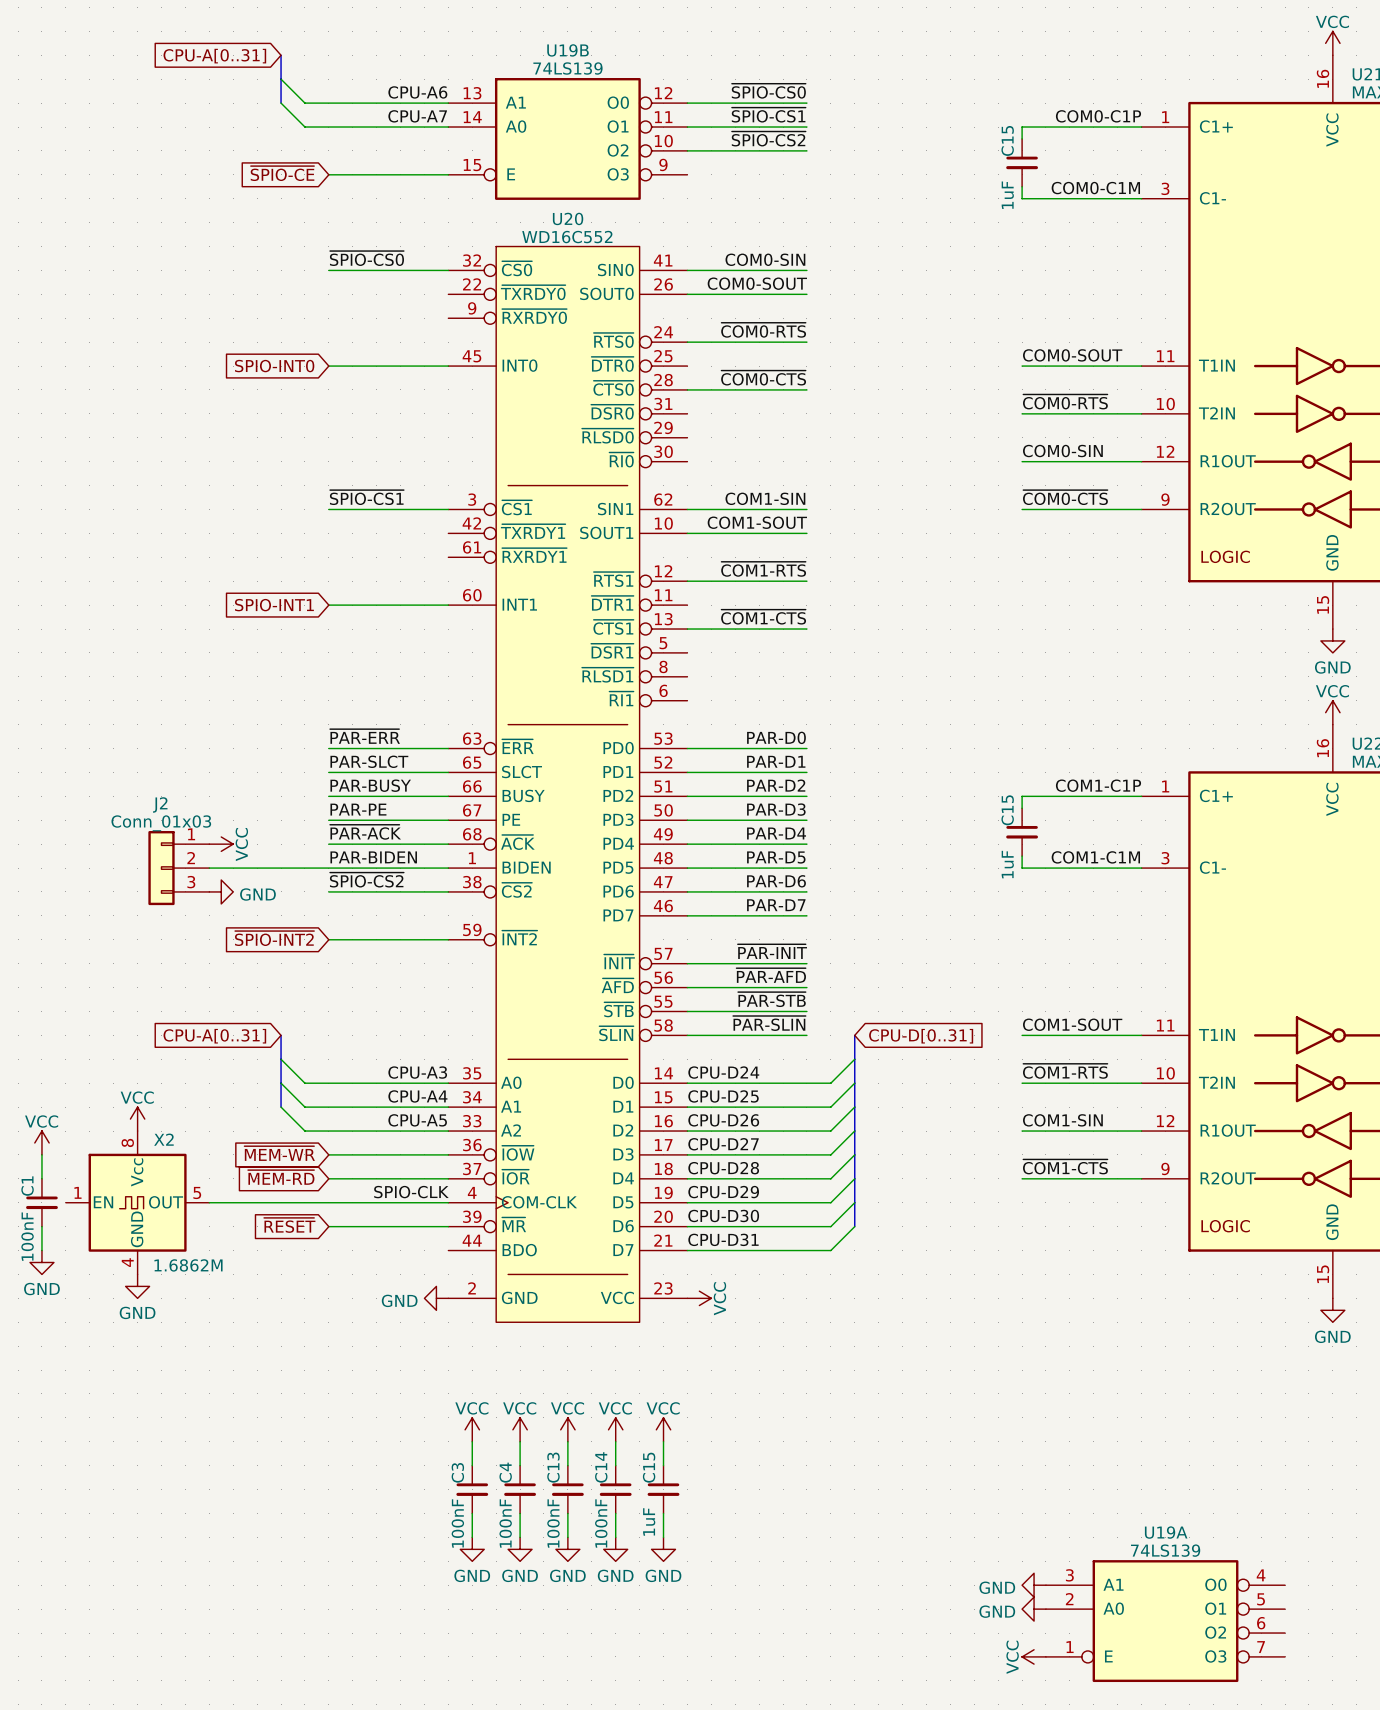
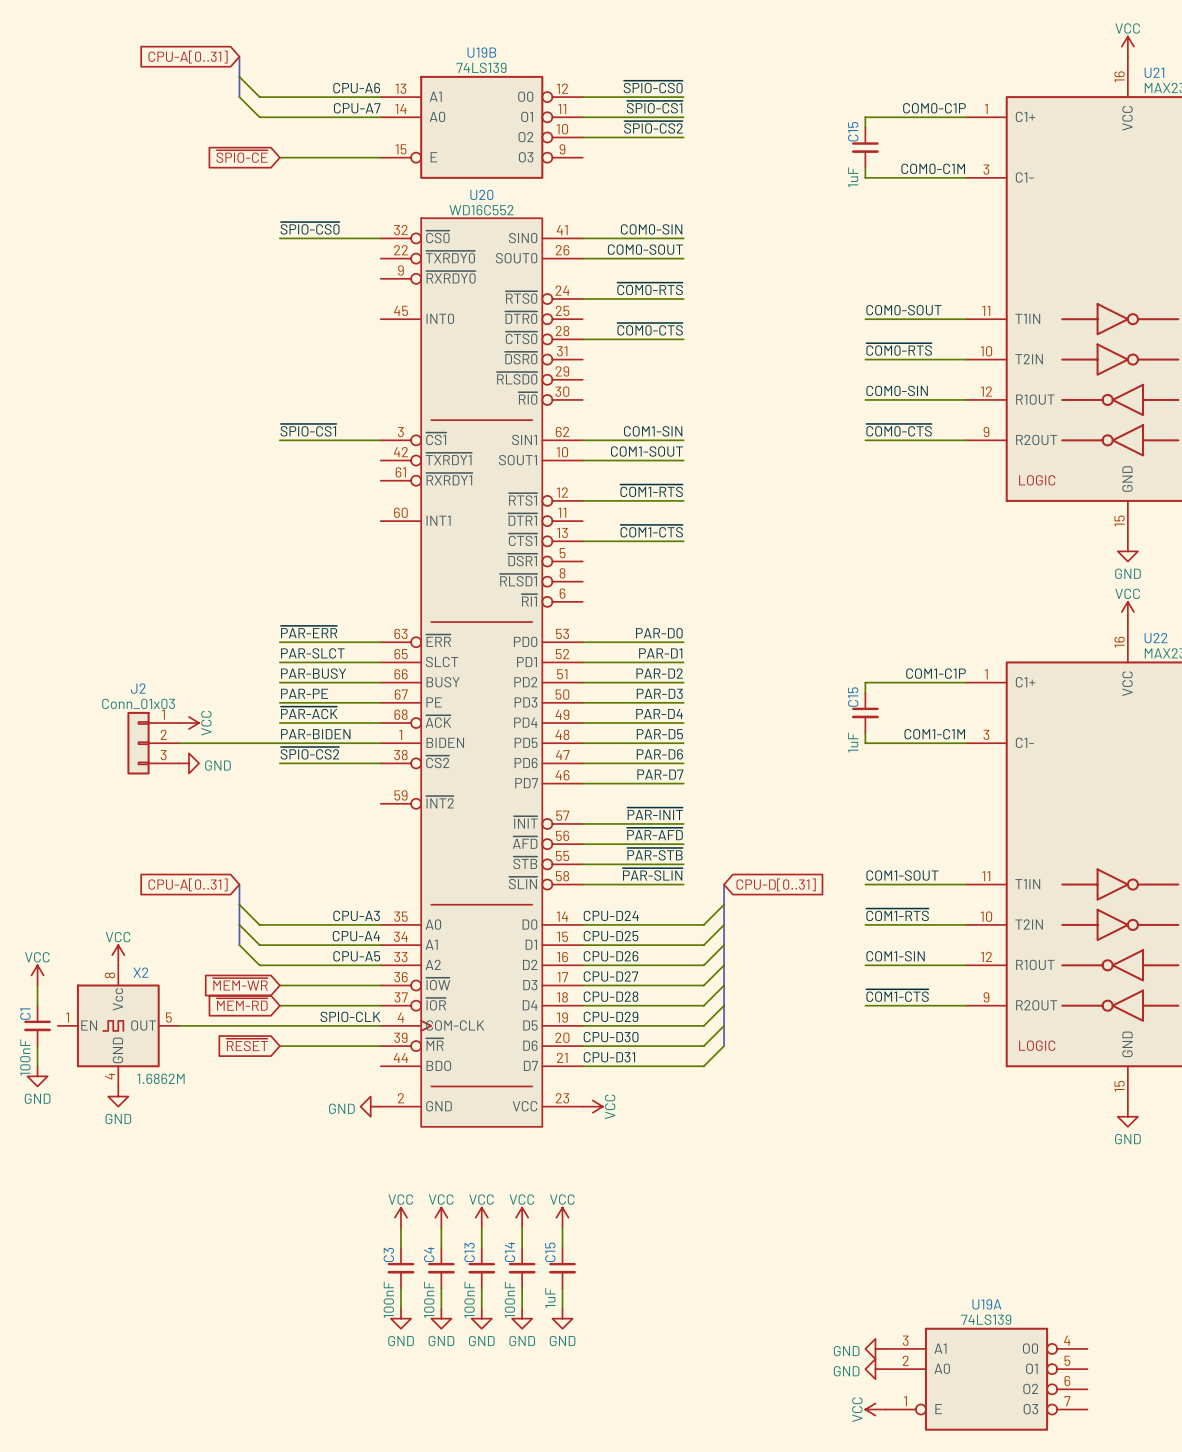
global label: SPIO-INT0 (274, 366) -> none
wire: (328, 366) (448, 366) -> none
global label: SPIO-INT1 (274, 605) -> none
wire: (328, 605) (448, 605) -> none
global label: ~{SPIO-INT2} (274, 938) -> none
wire: (328, 939) (448, 939) -> none

